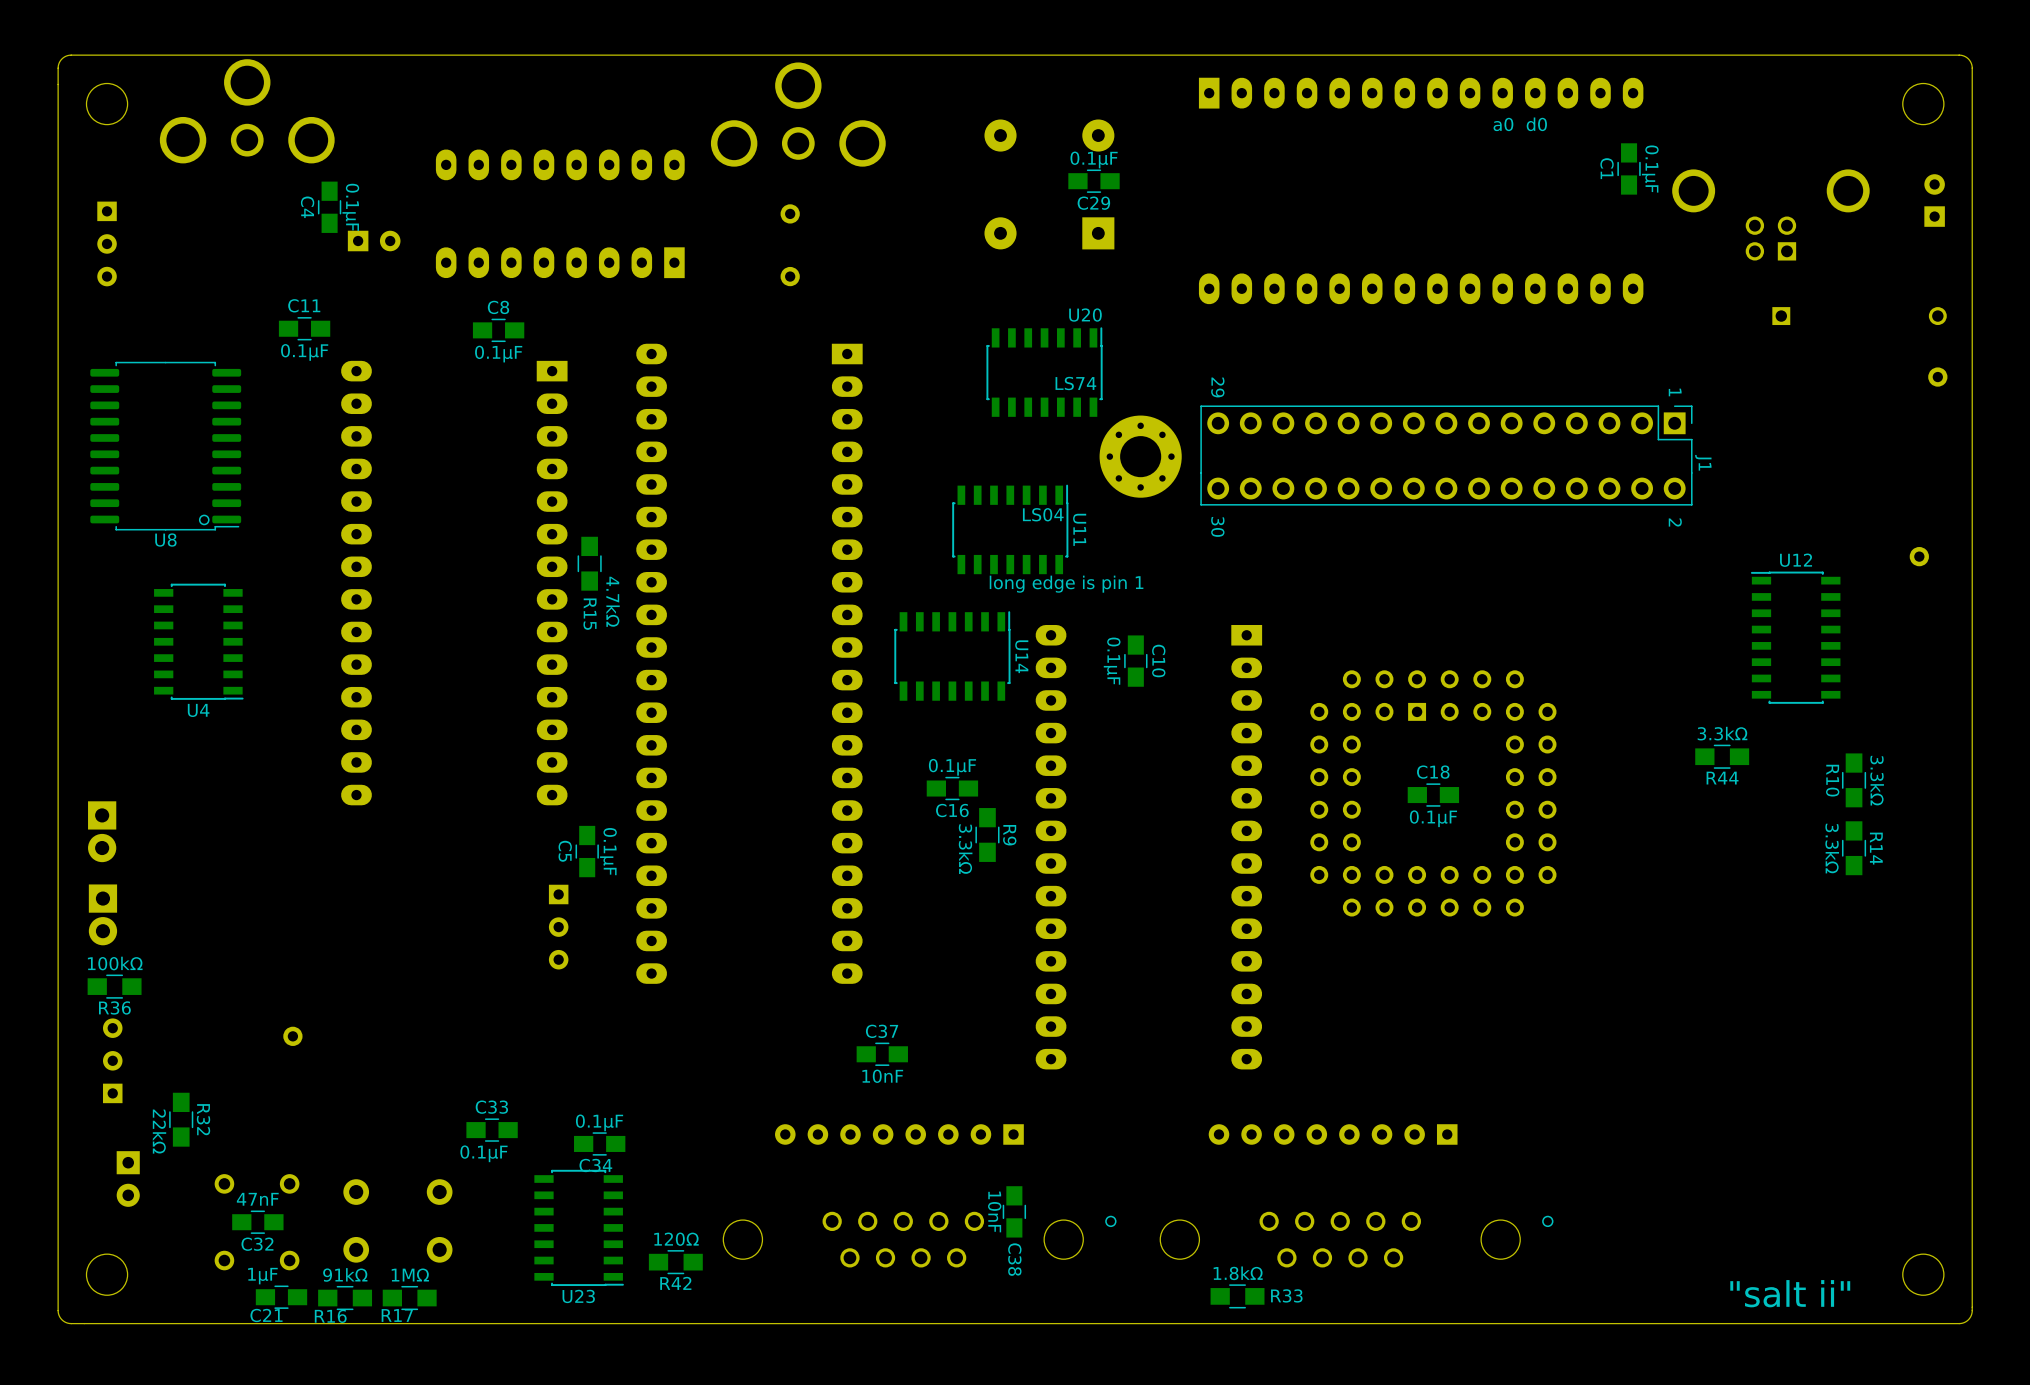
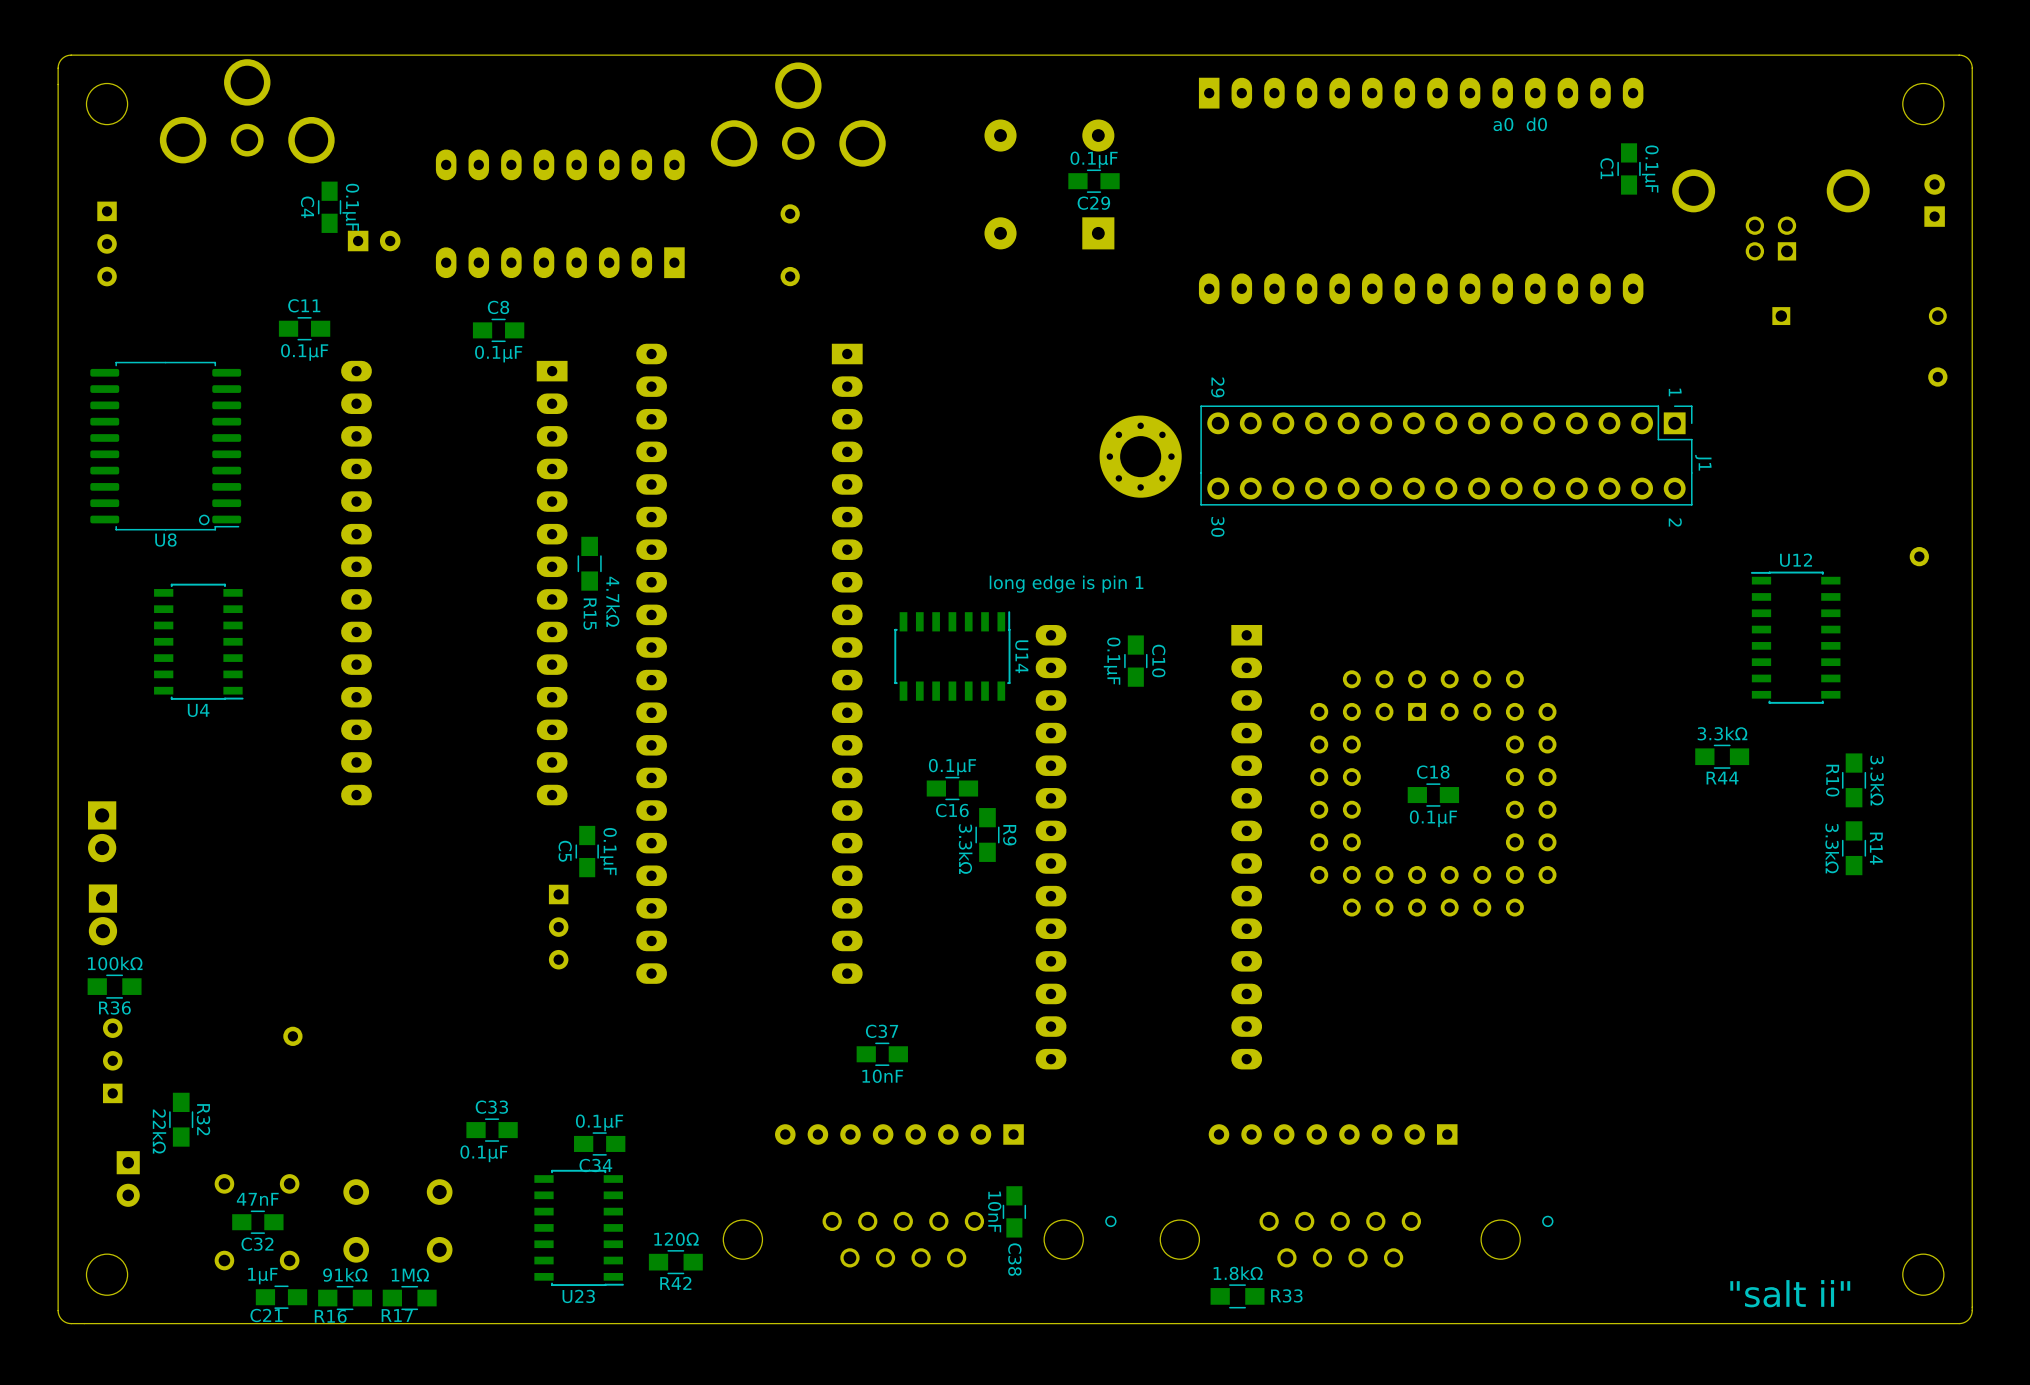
U20: (1044, 372) -> none
text: LS74 (1075, 383) -> none
text: LS04 (1043, 514) -> none
U11: (1010, 529) -> none

